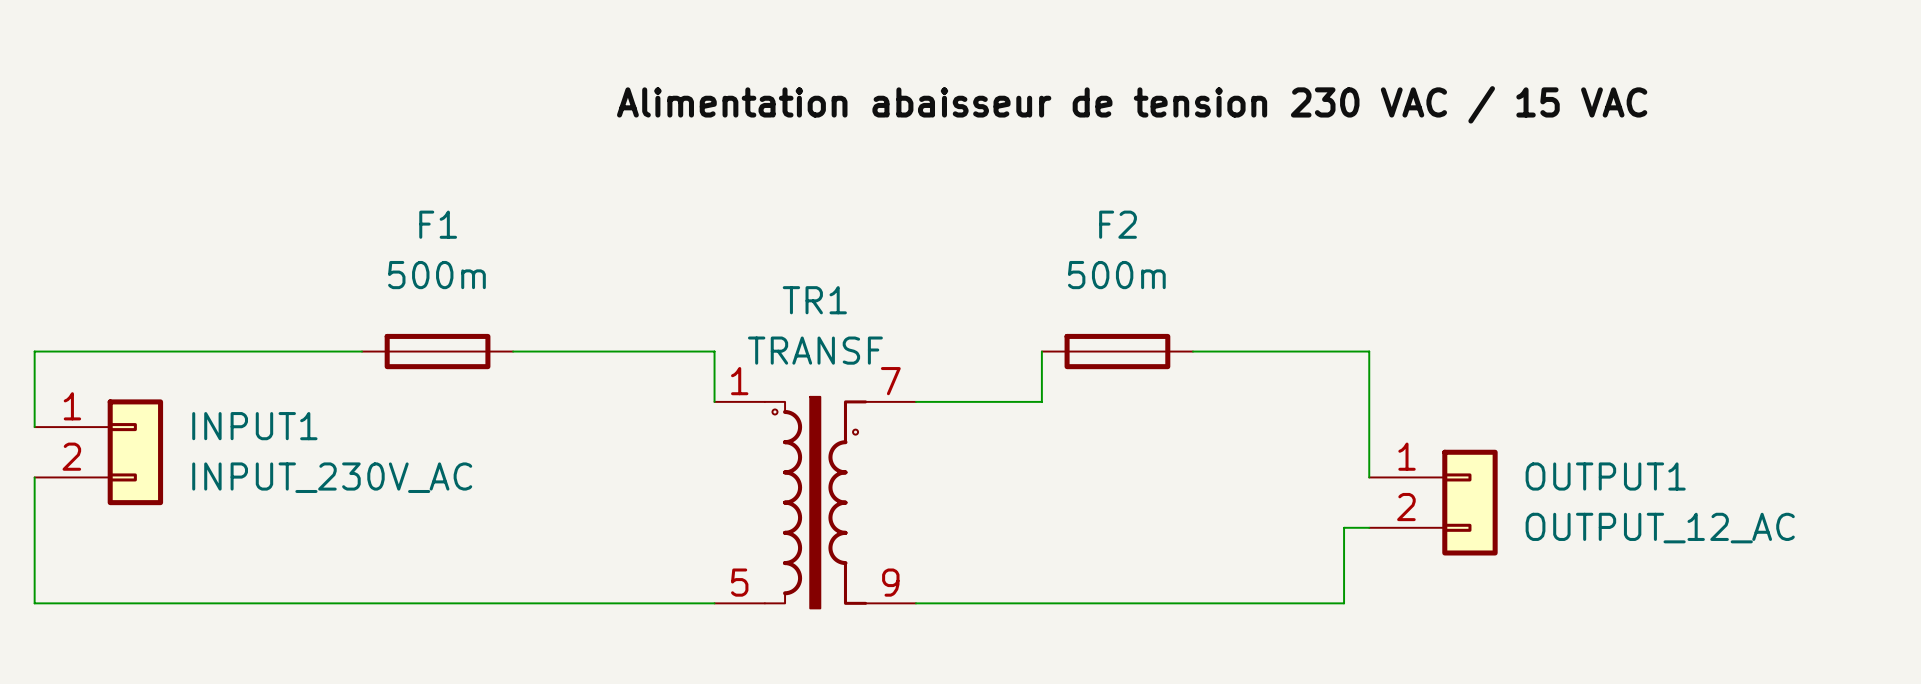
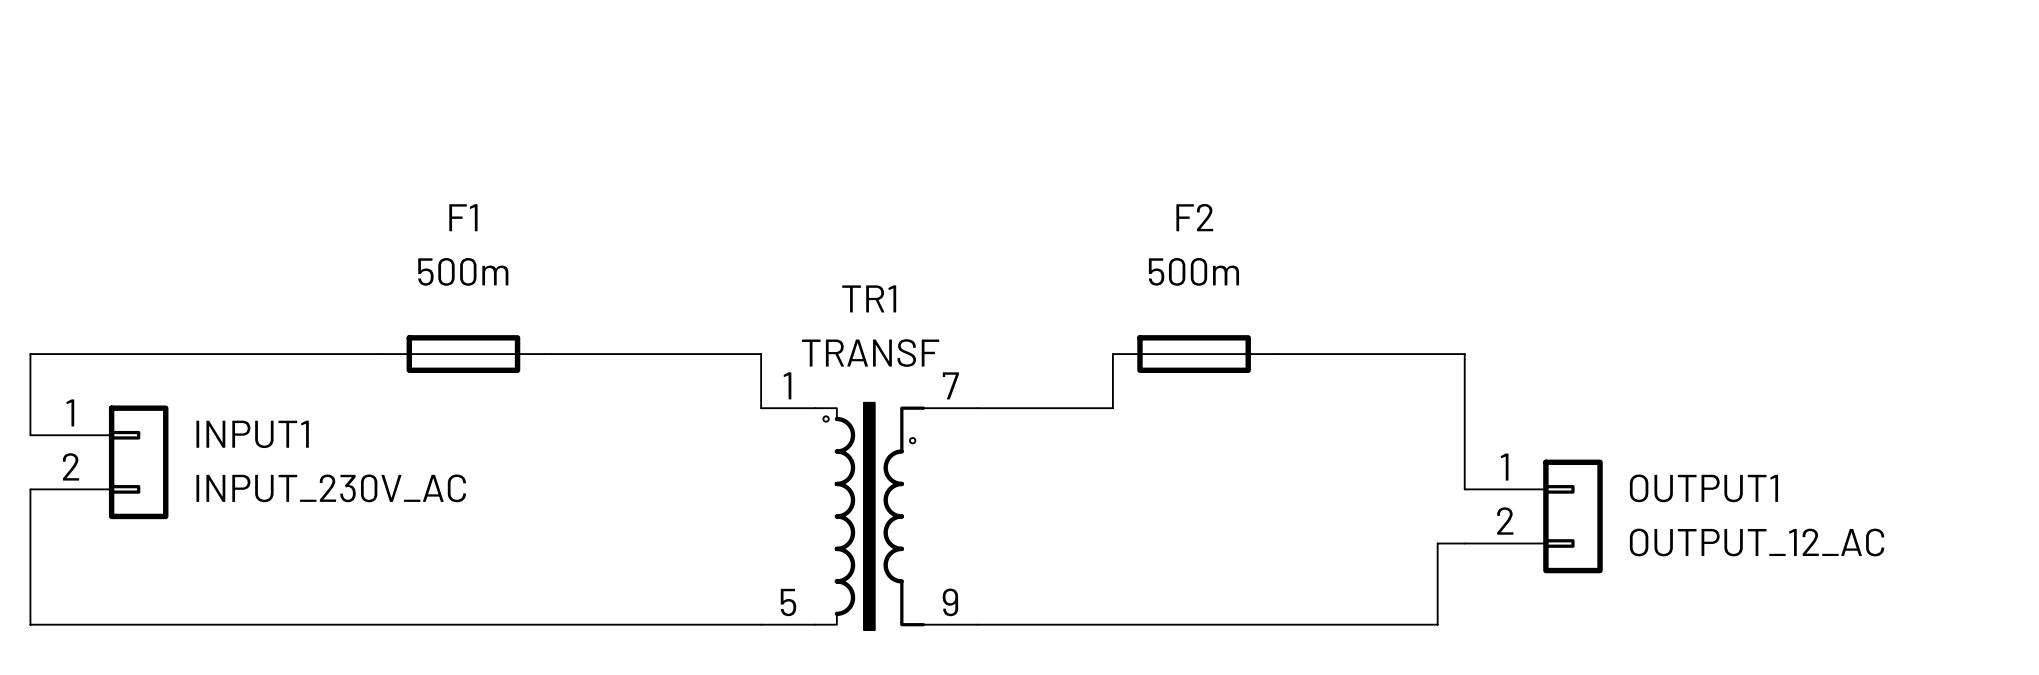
label: Alimentation abaisseur de tension 230 VAC / 15 VAC (1132, 104) -> none

